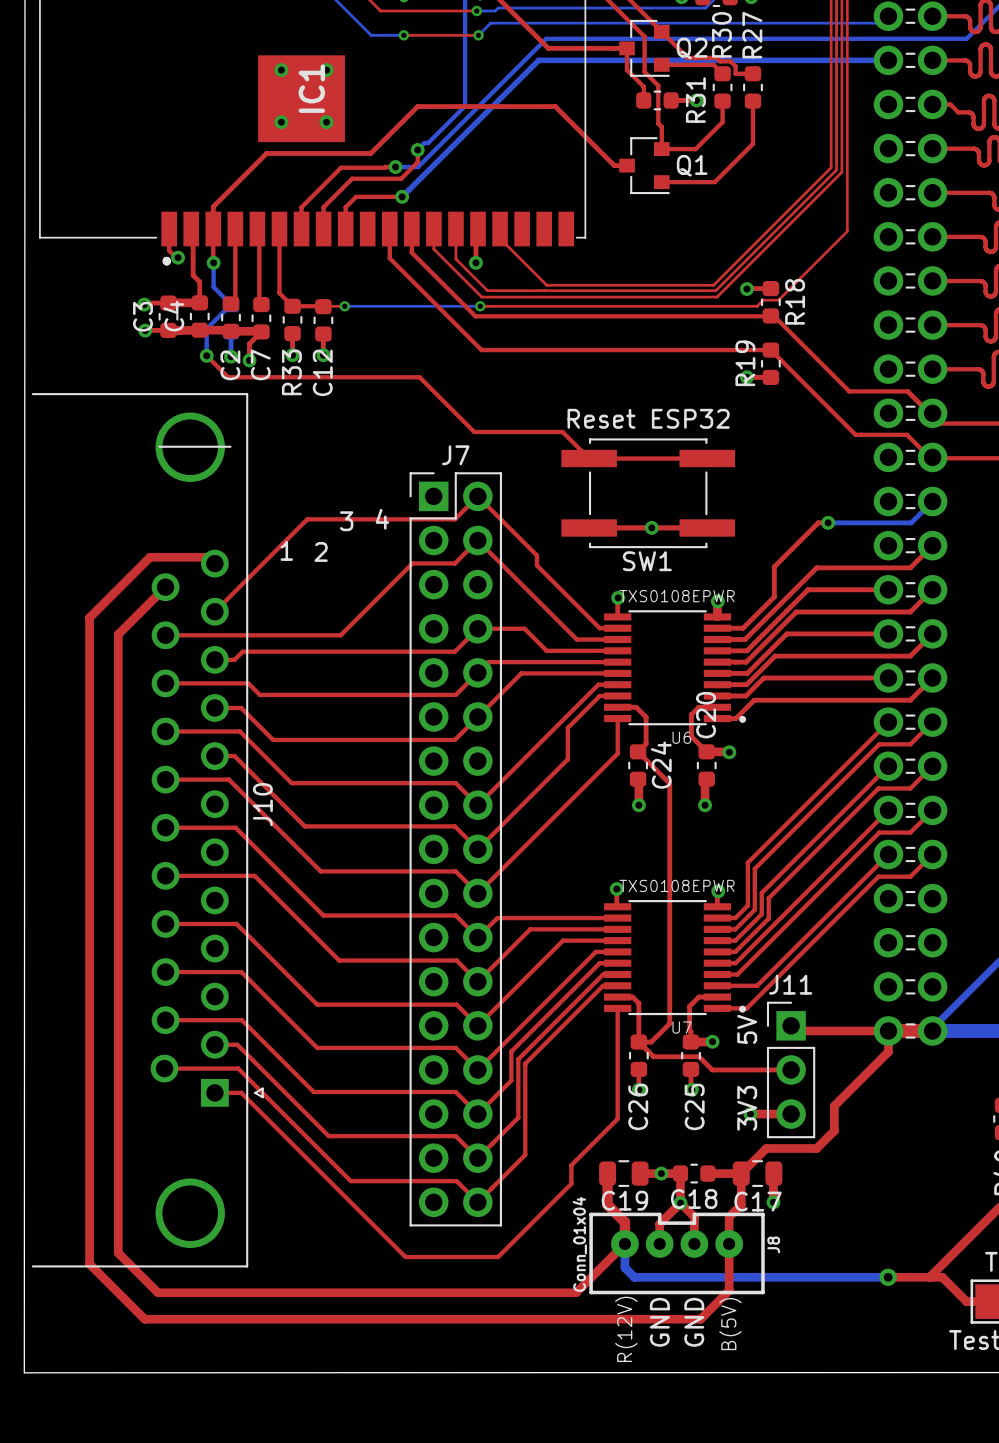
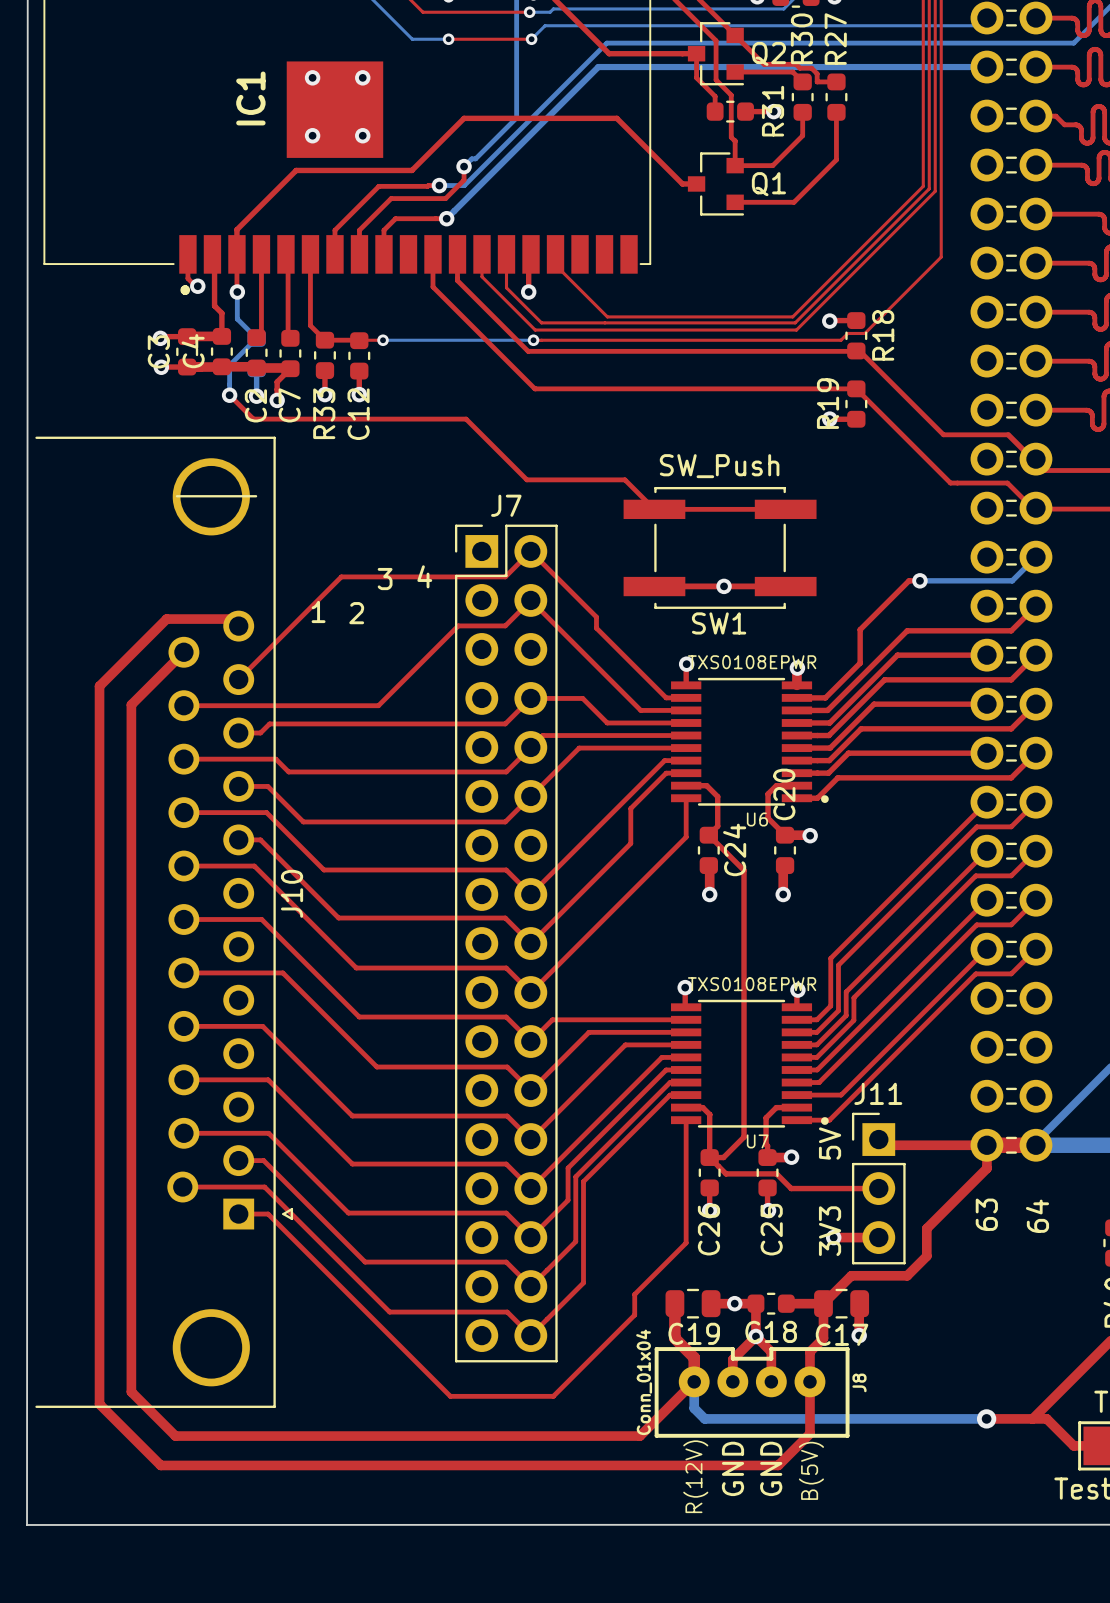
IC1 name position: IC1 (311, 88) -> IC1 (250, 98)
SW1 value: Reset ESP32 (648, 418) -> SW_Push (719, 466)
part text: none -> 63 (986, 1214)
part text: none -> 64 (1037, 1216)

